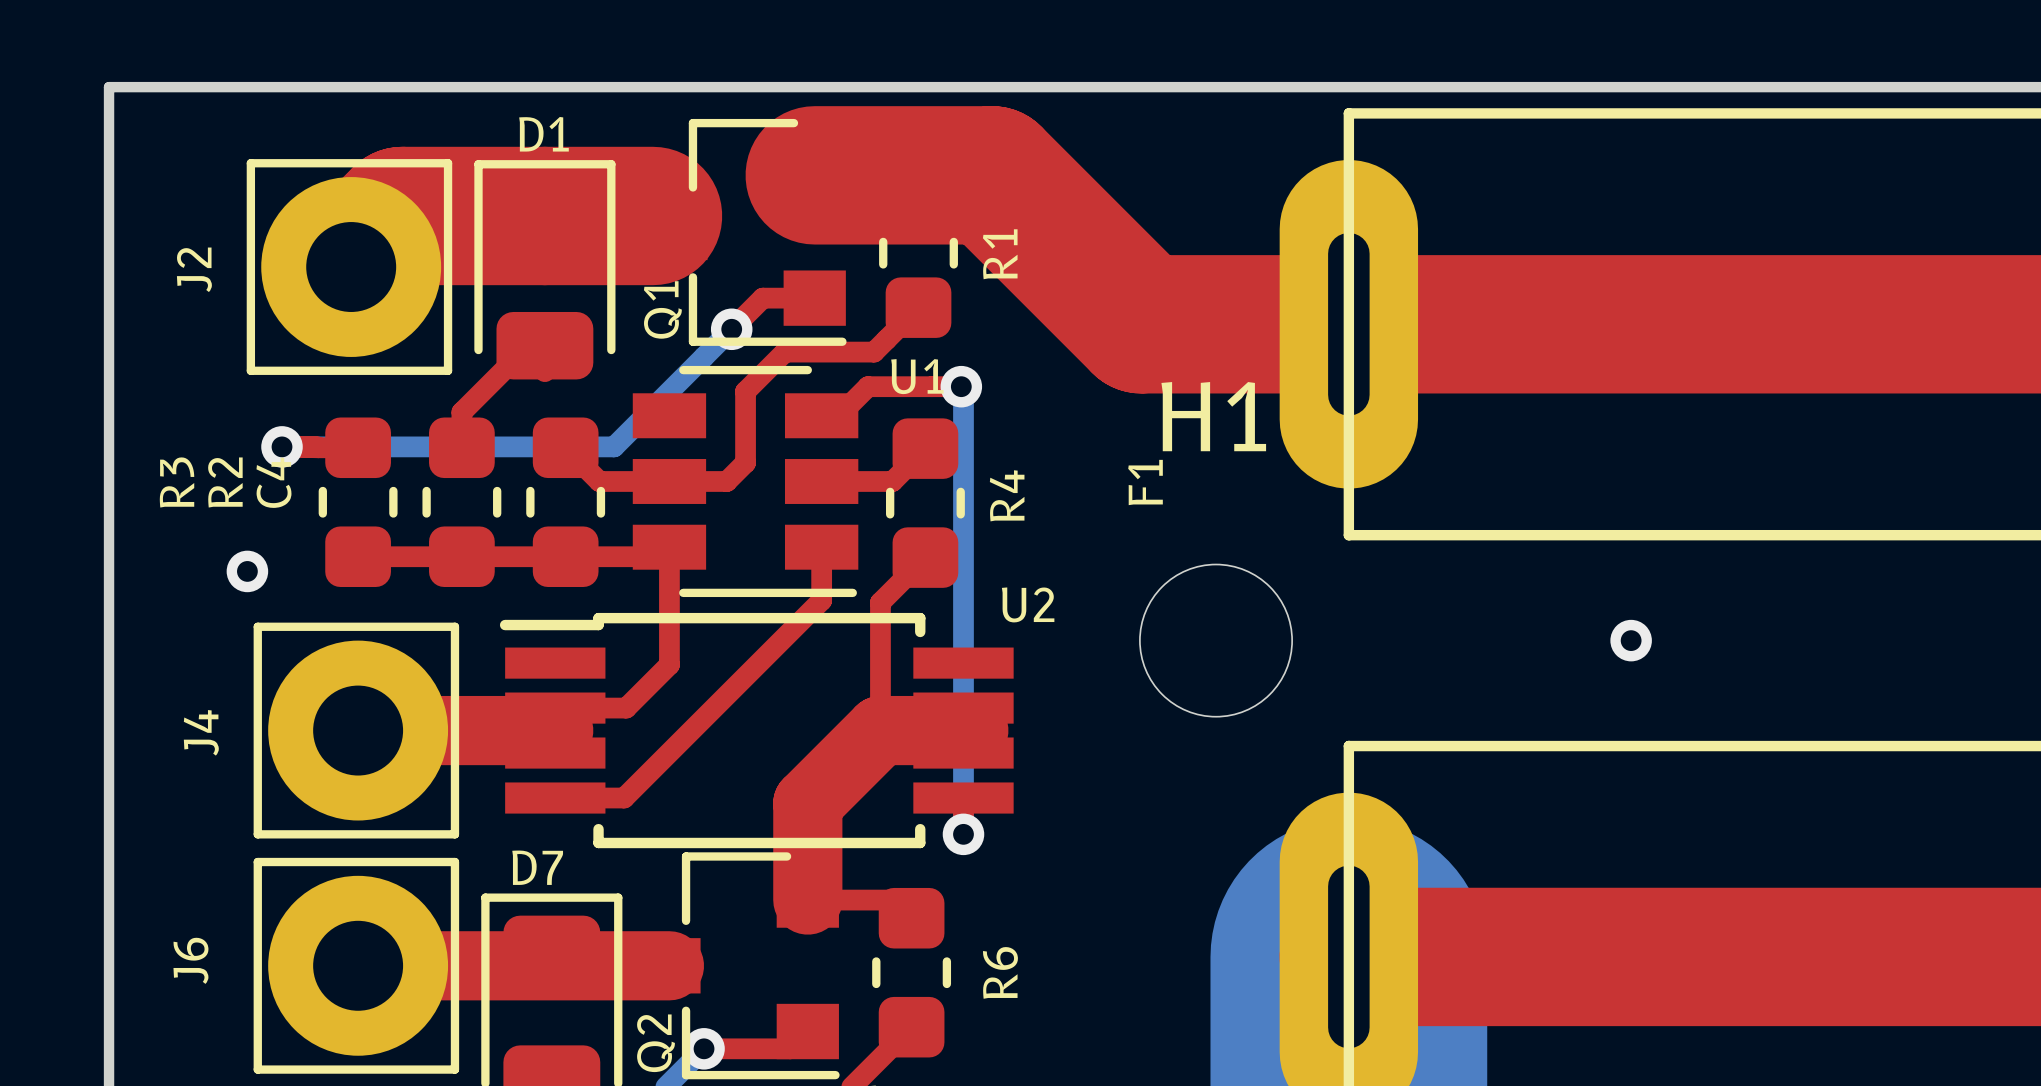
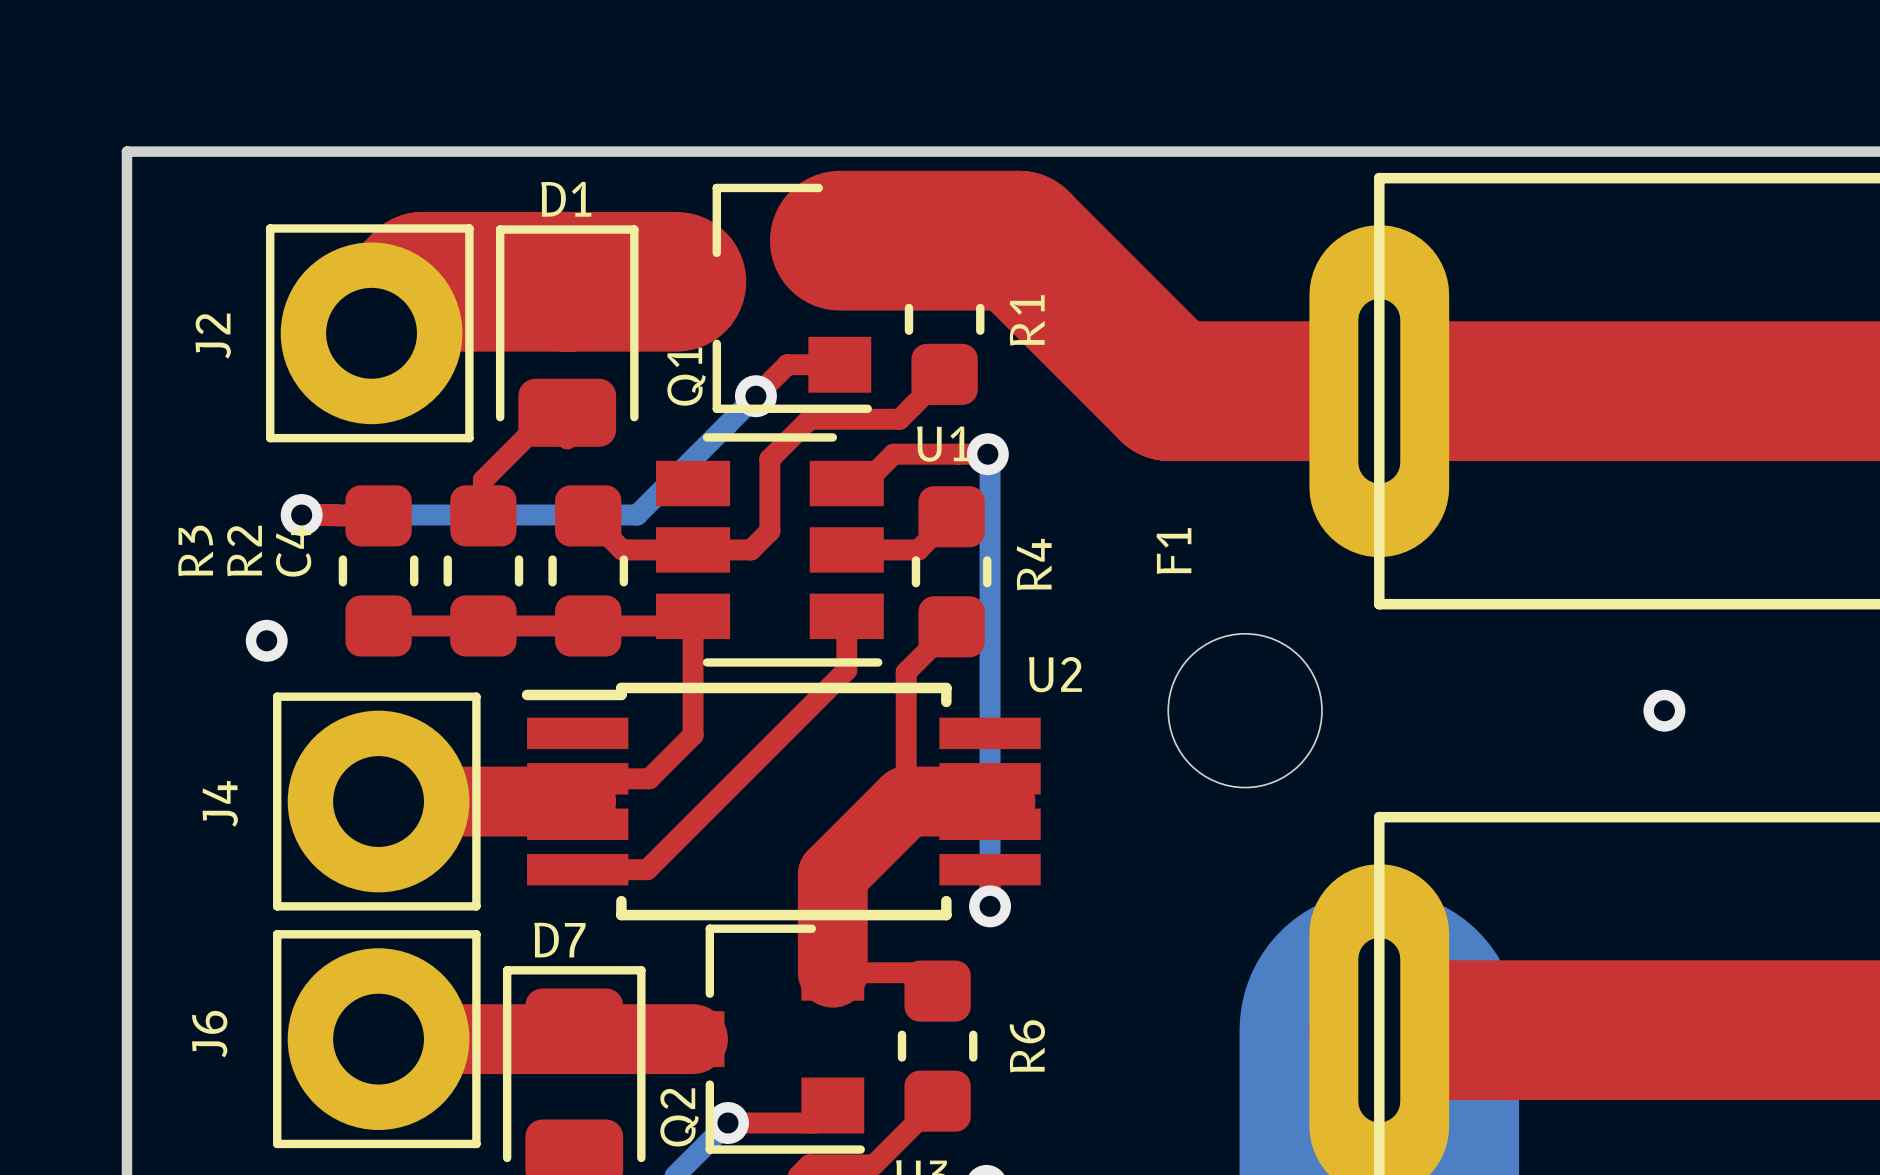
H1 name: H1 (1213, 416) -> none

